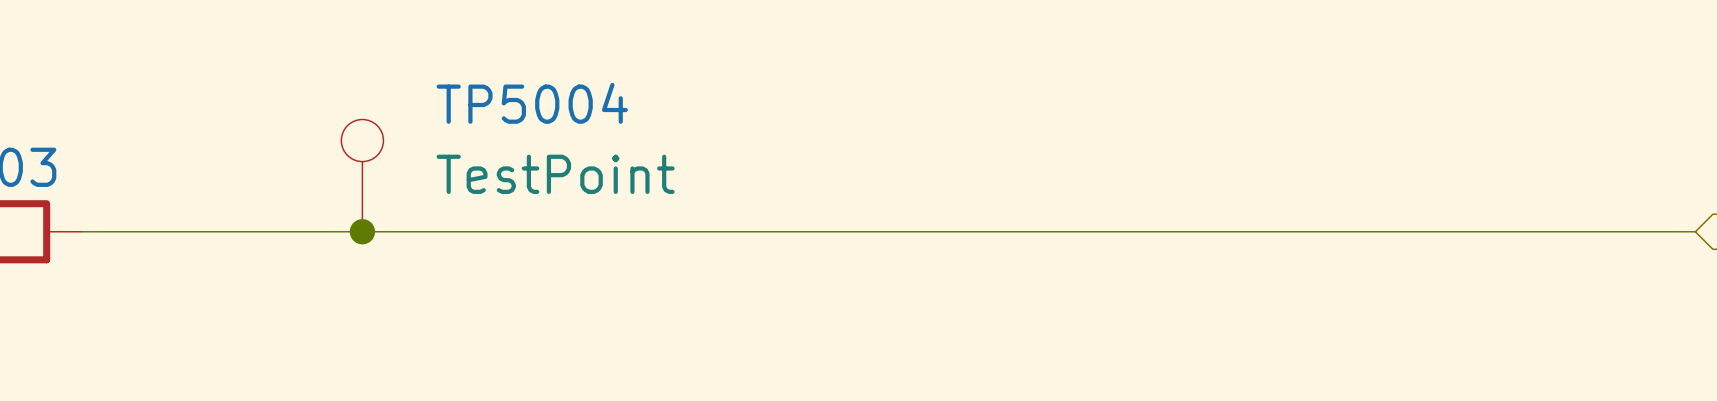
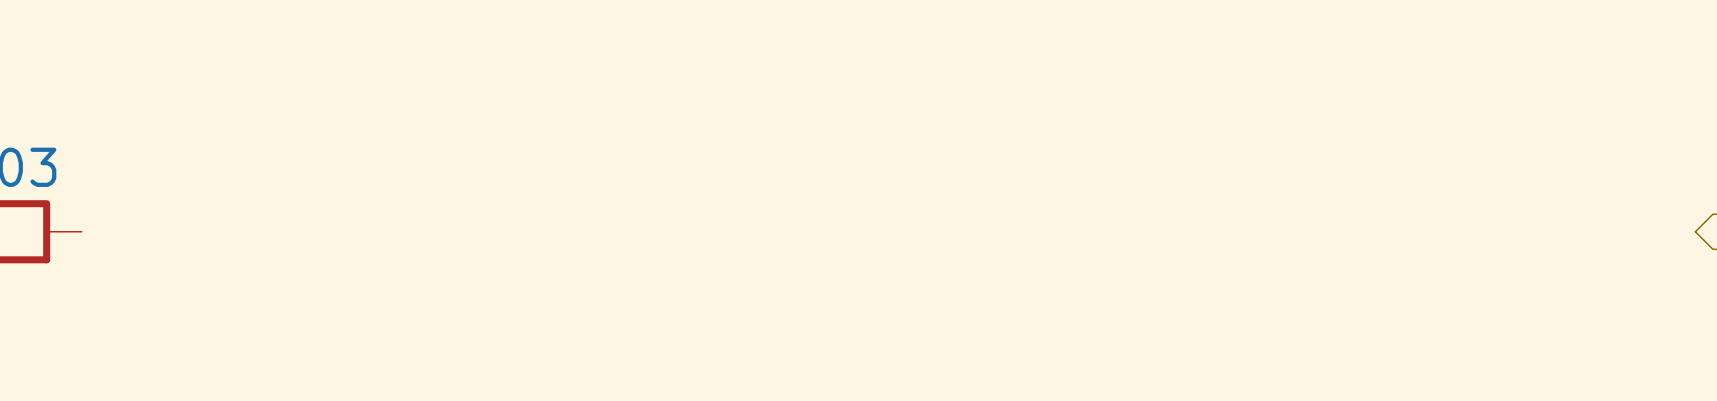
TP5004: TestPoint (362, 175) -> none
wire: (81, 231) (1695, 231) -> none
junction: (362, 231) -> none

